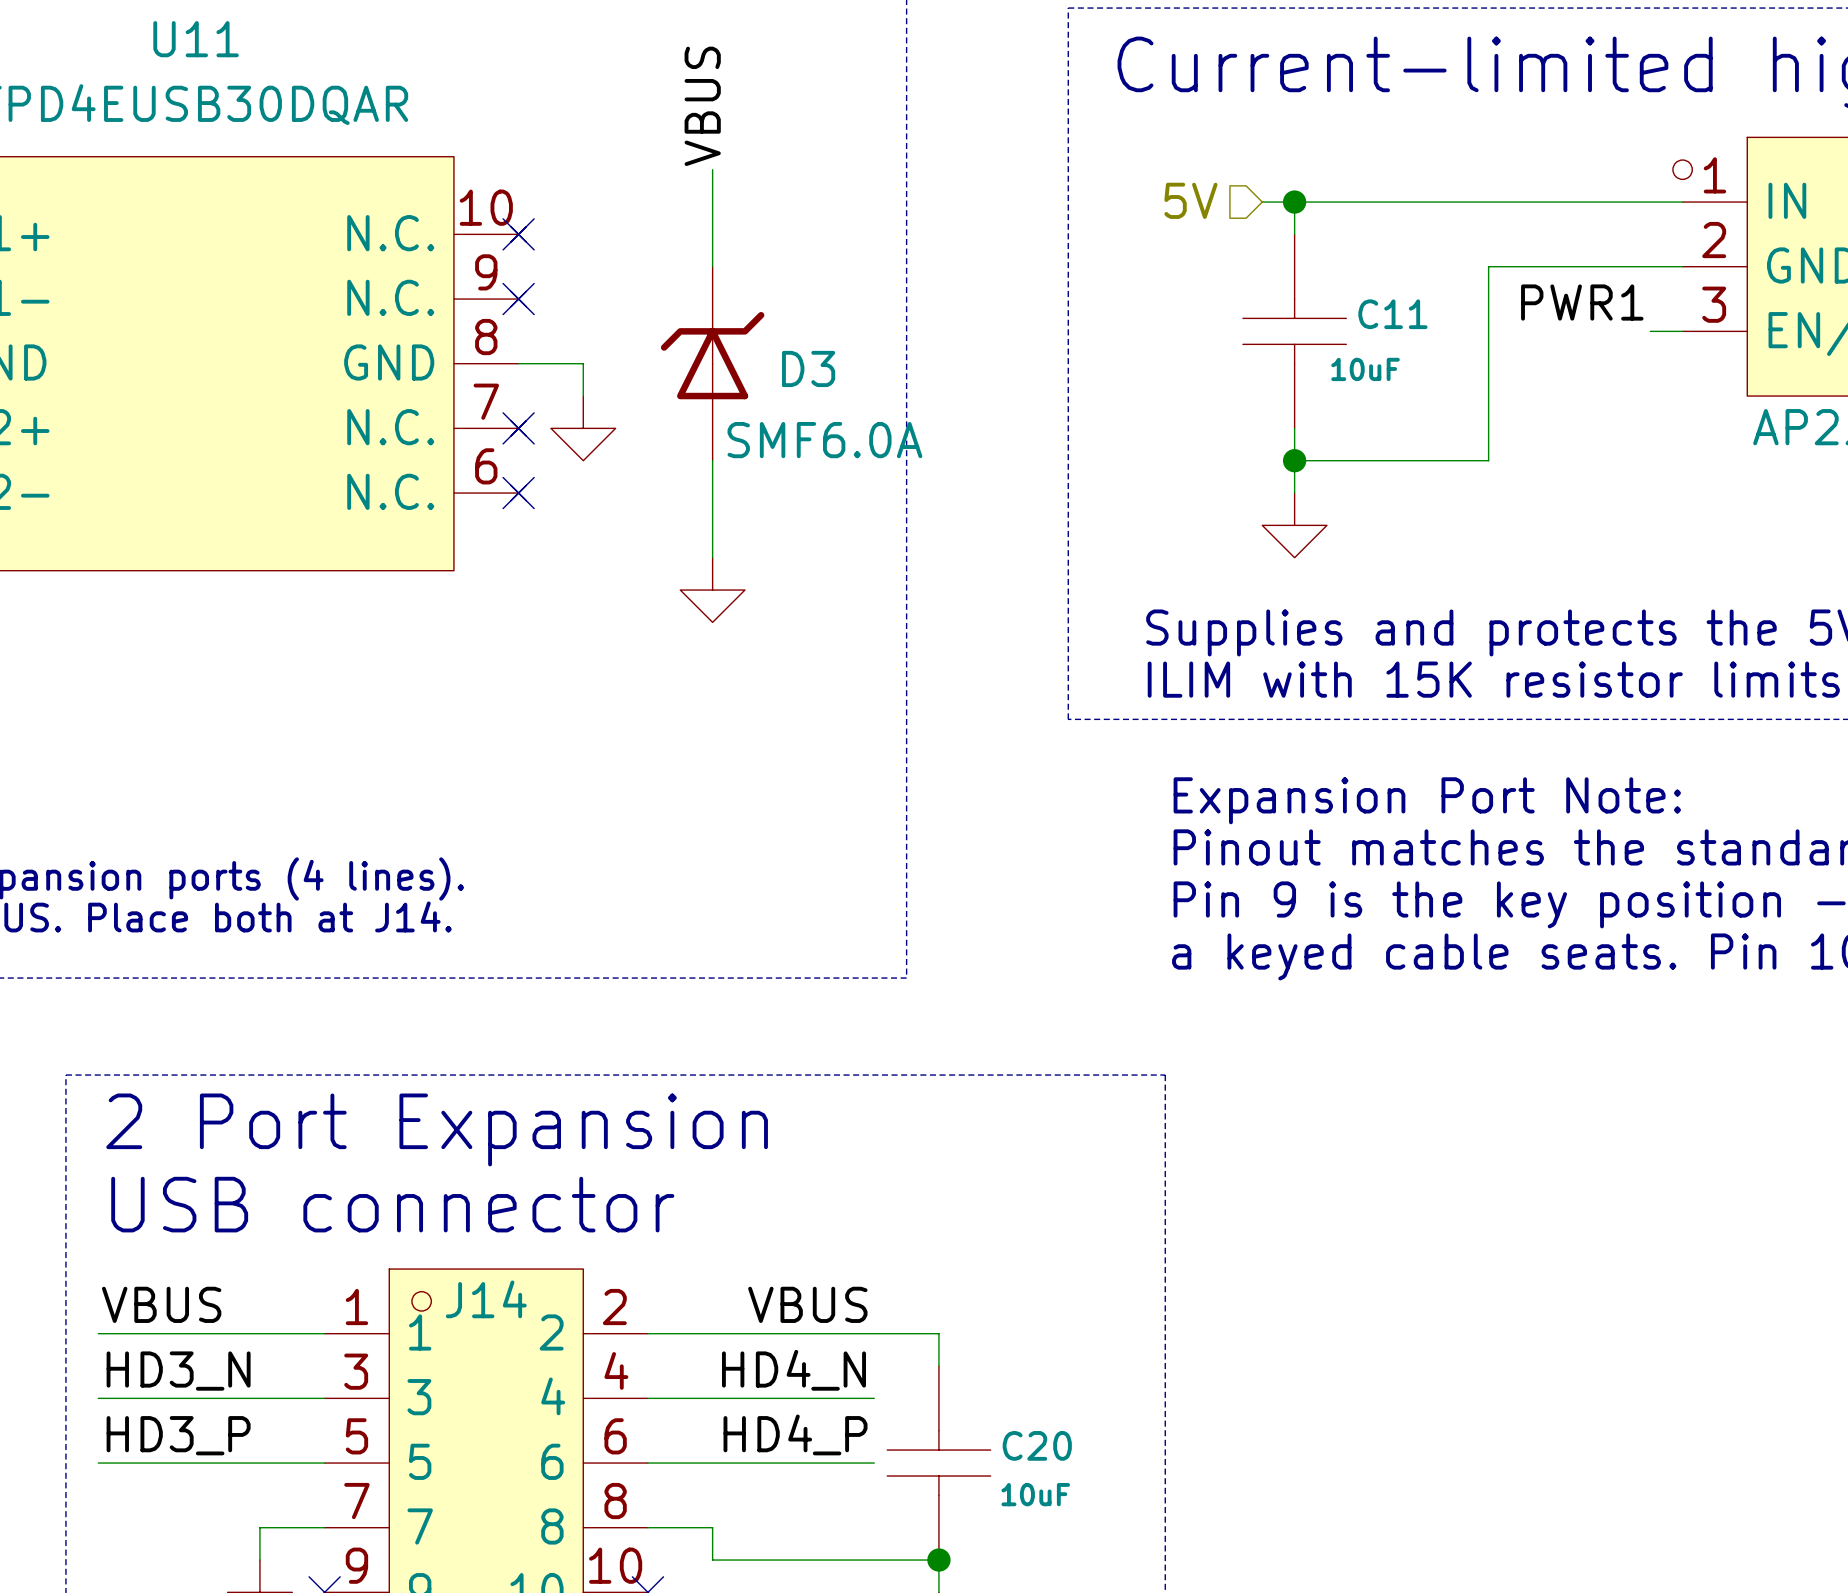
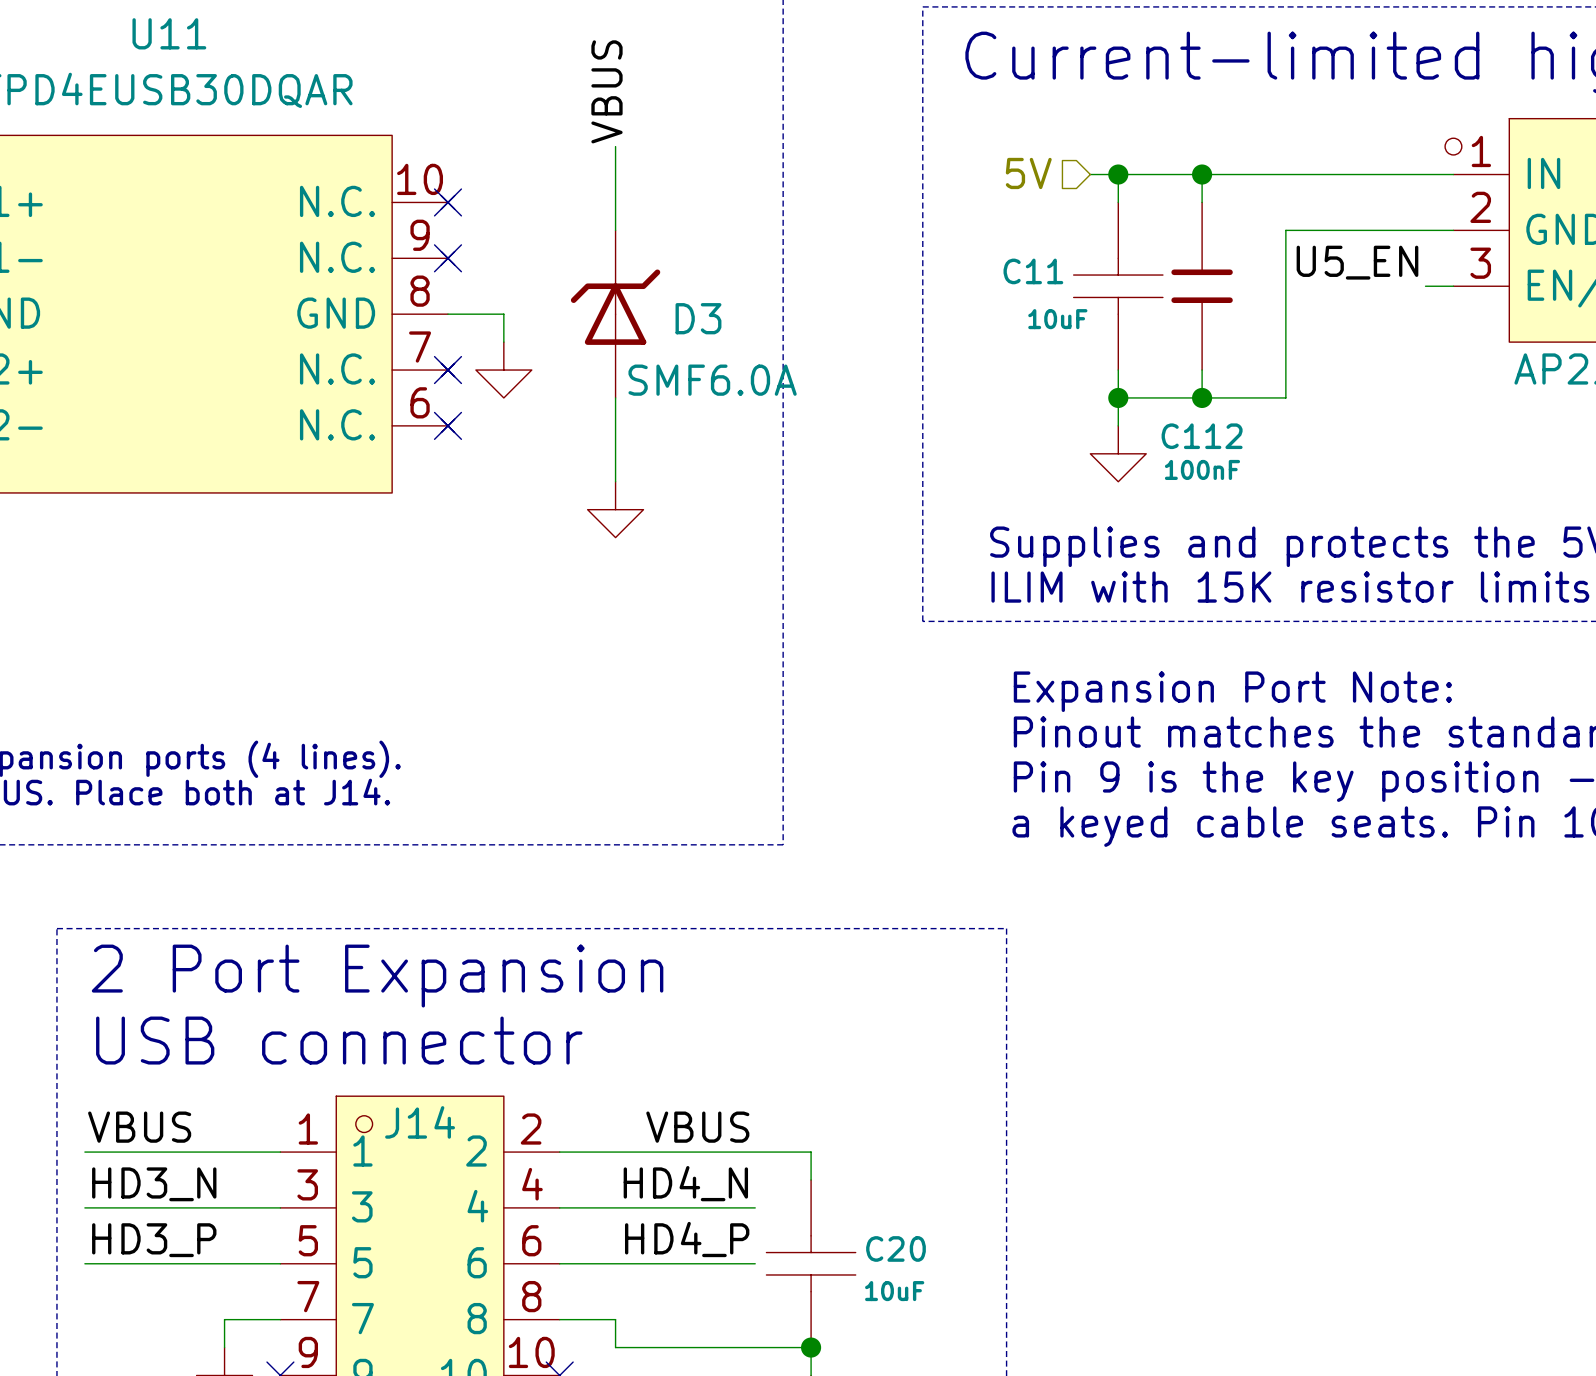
wire: none -> (1202, 174) (1202, 202)
junction: none -> (1202, 174)
label: PWR1 (1582, 302) -> U5_EN (1357, 262)
C11 name position: C11 (1392, 314) -> C11 (1033, 271)
C112: none -> 100nF (1202, 286)
C11 value position: 10uF (1365, 369) -> 10uF (1057, 319)
wire: none -> (1202, 370) (1202, 397)
junction: none -> (1202, 397)

